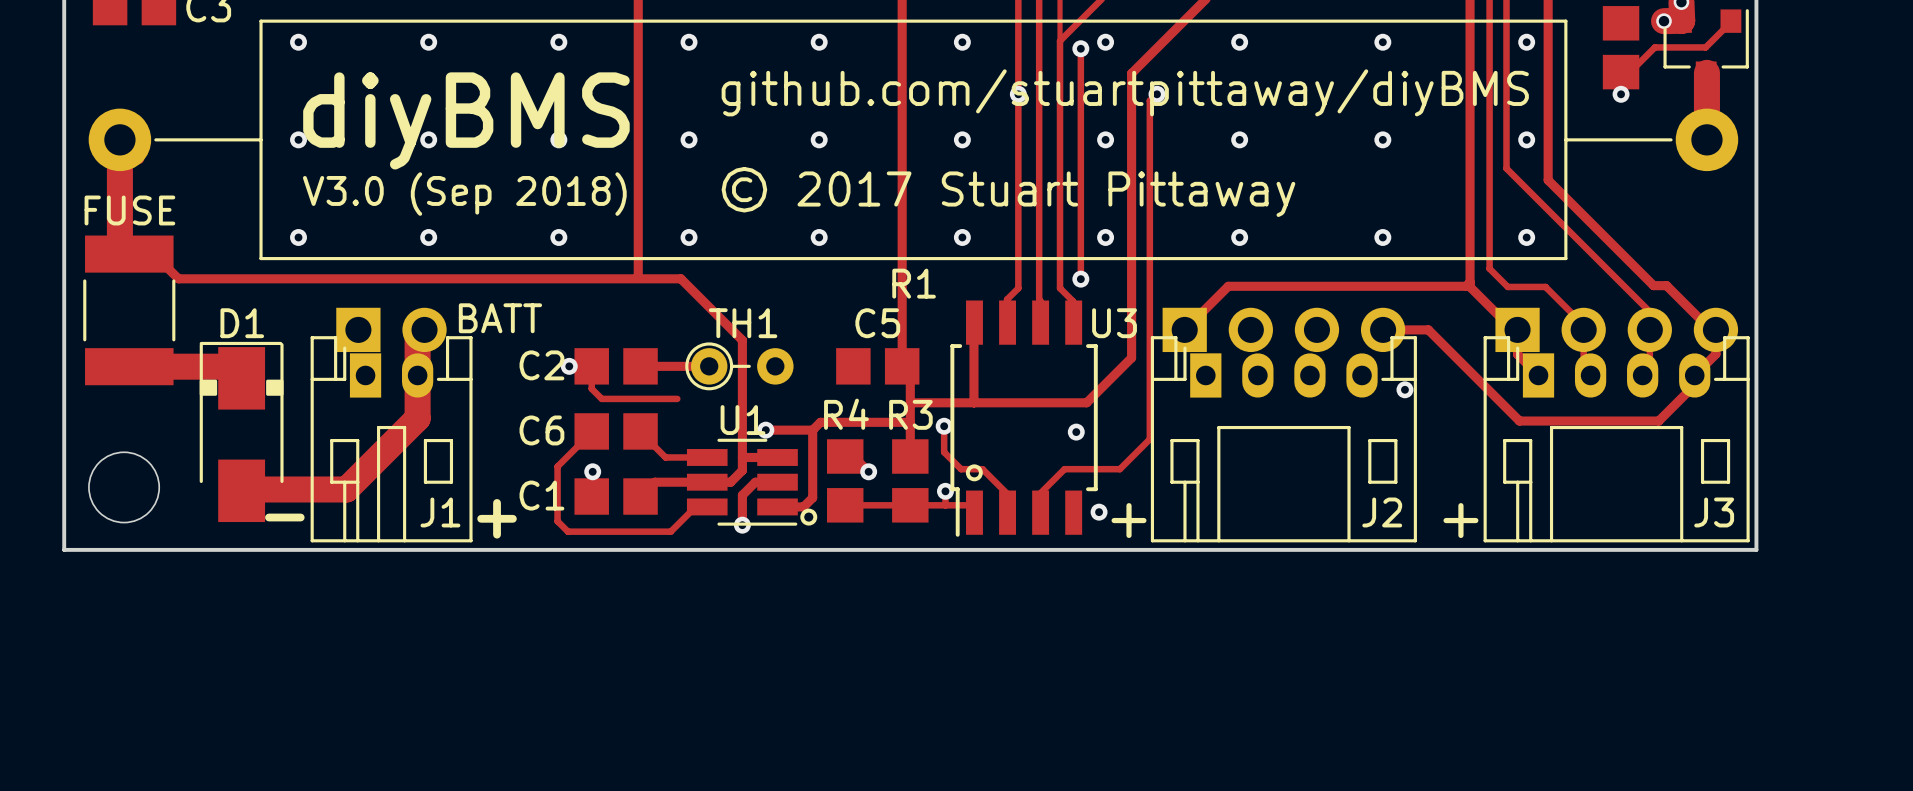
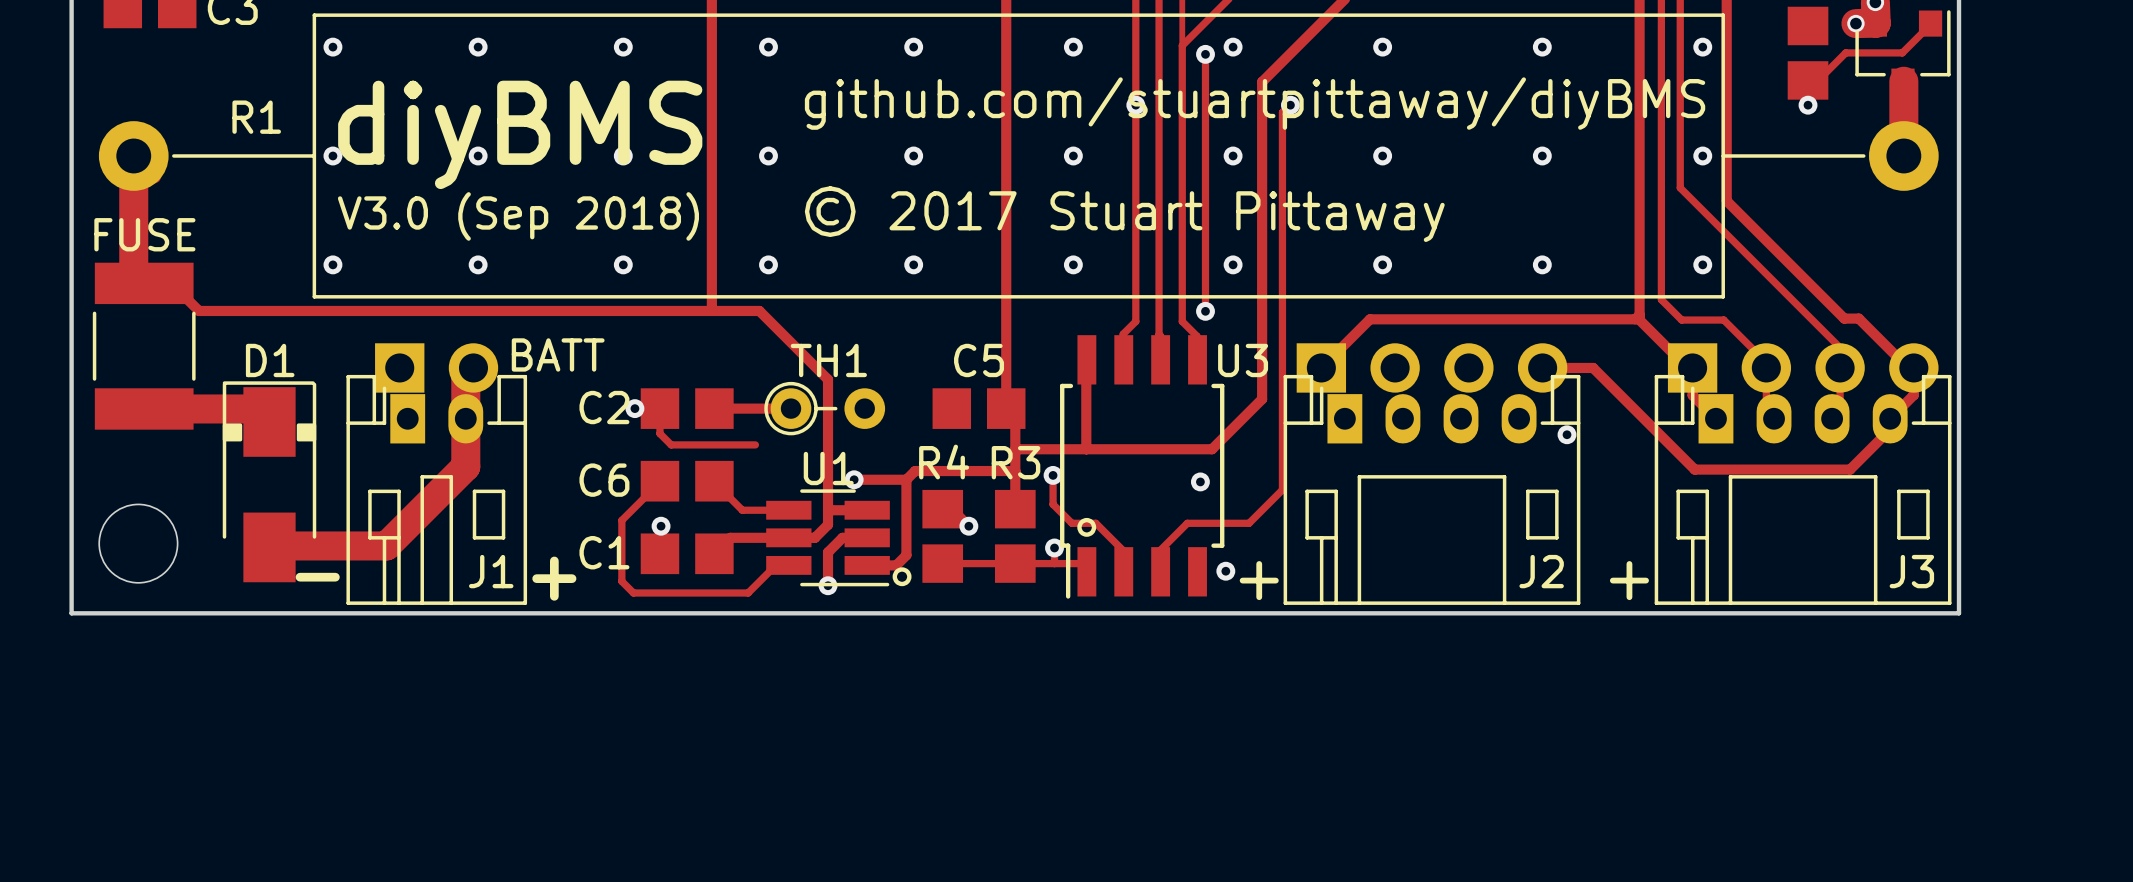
R1 footprint: [88, 19, 1739, 261] -> [98, 13, 1939, 299]
R1 name position: R1 (914, 283) -> R1 (256, 117)

